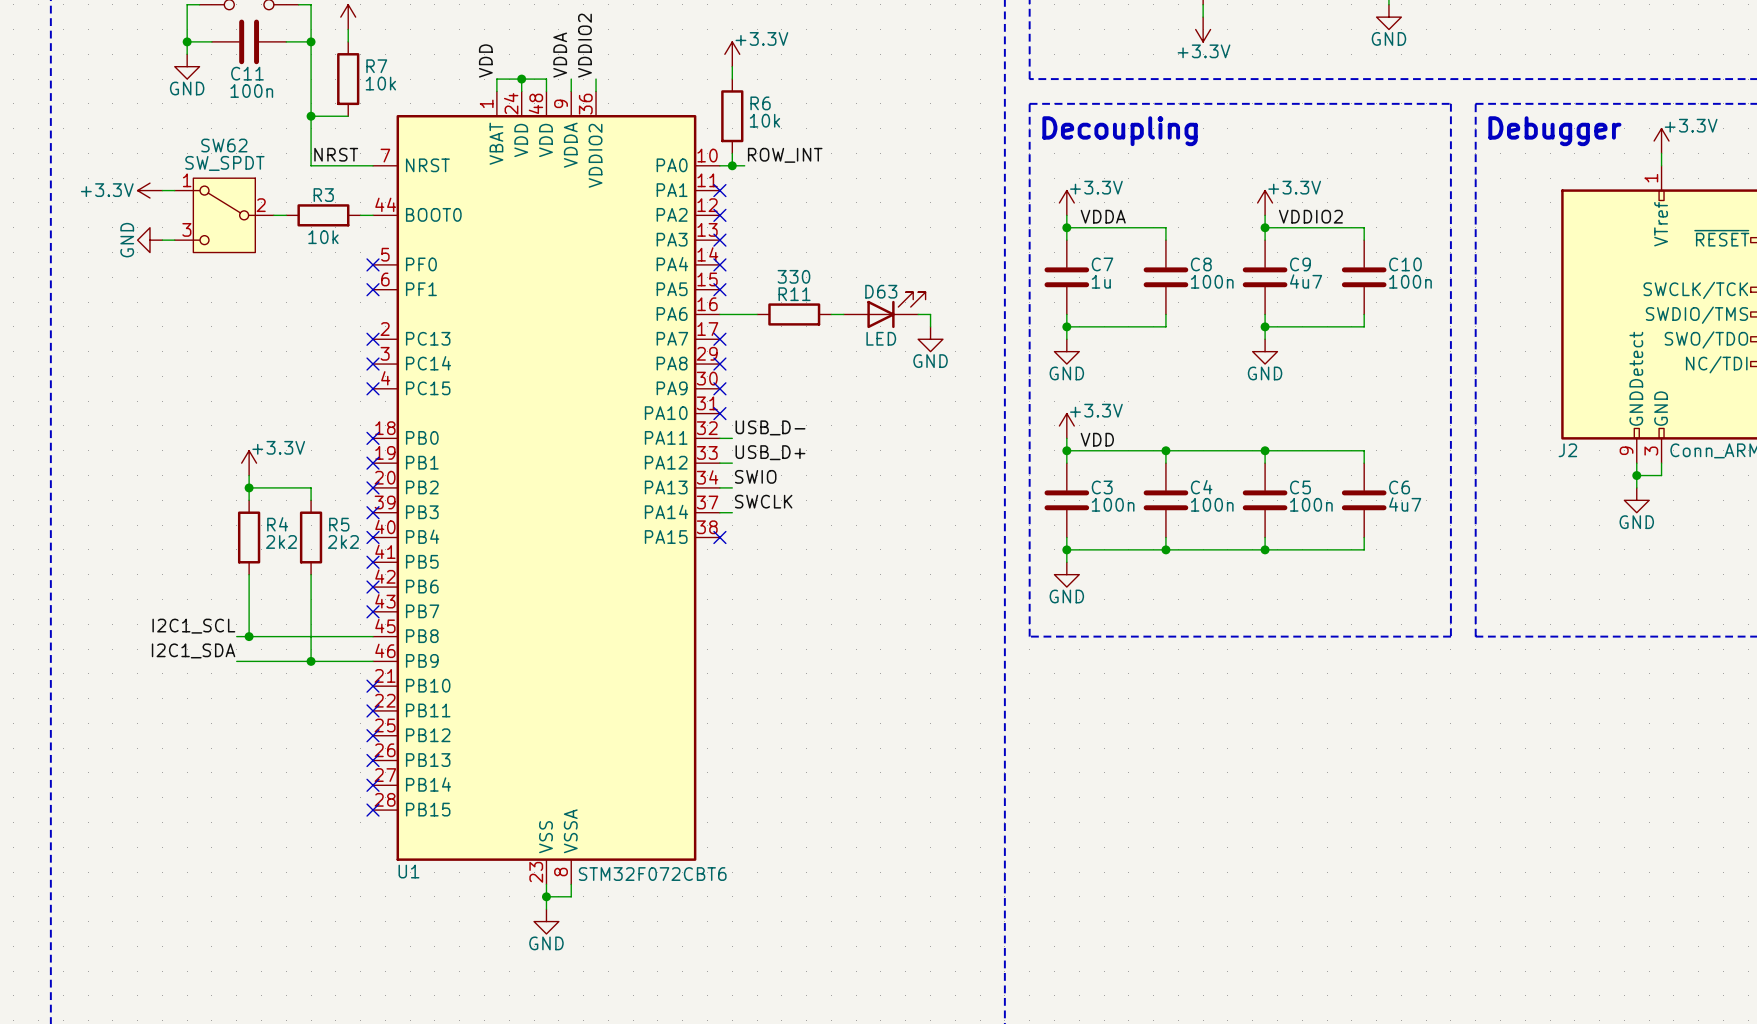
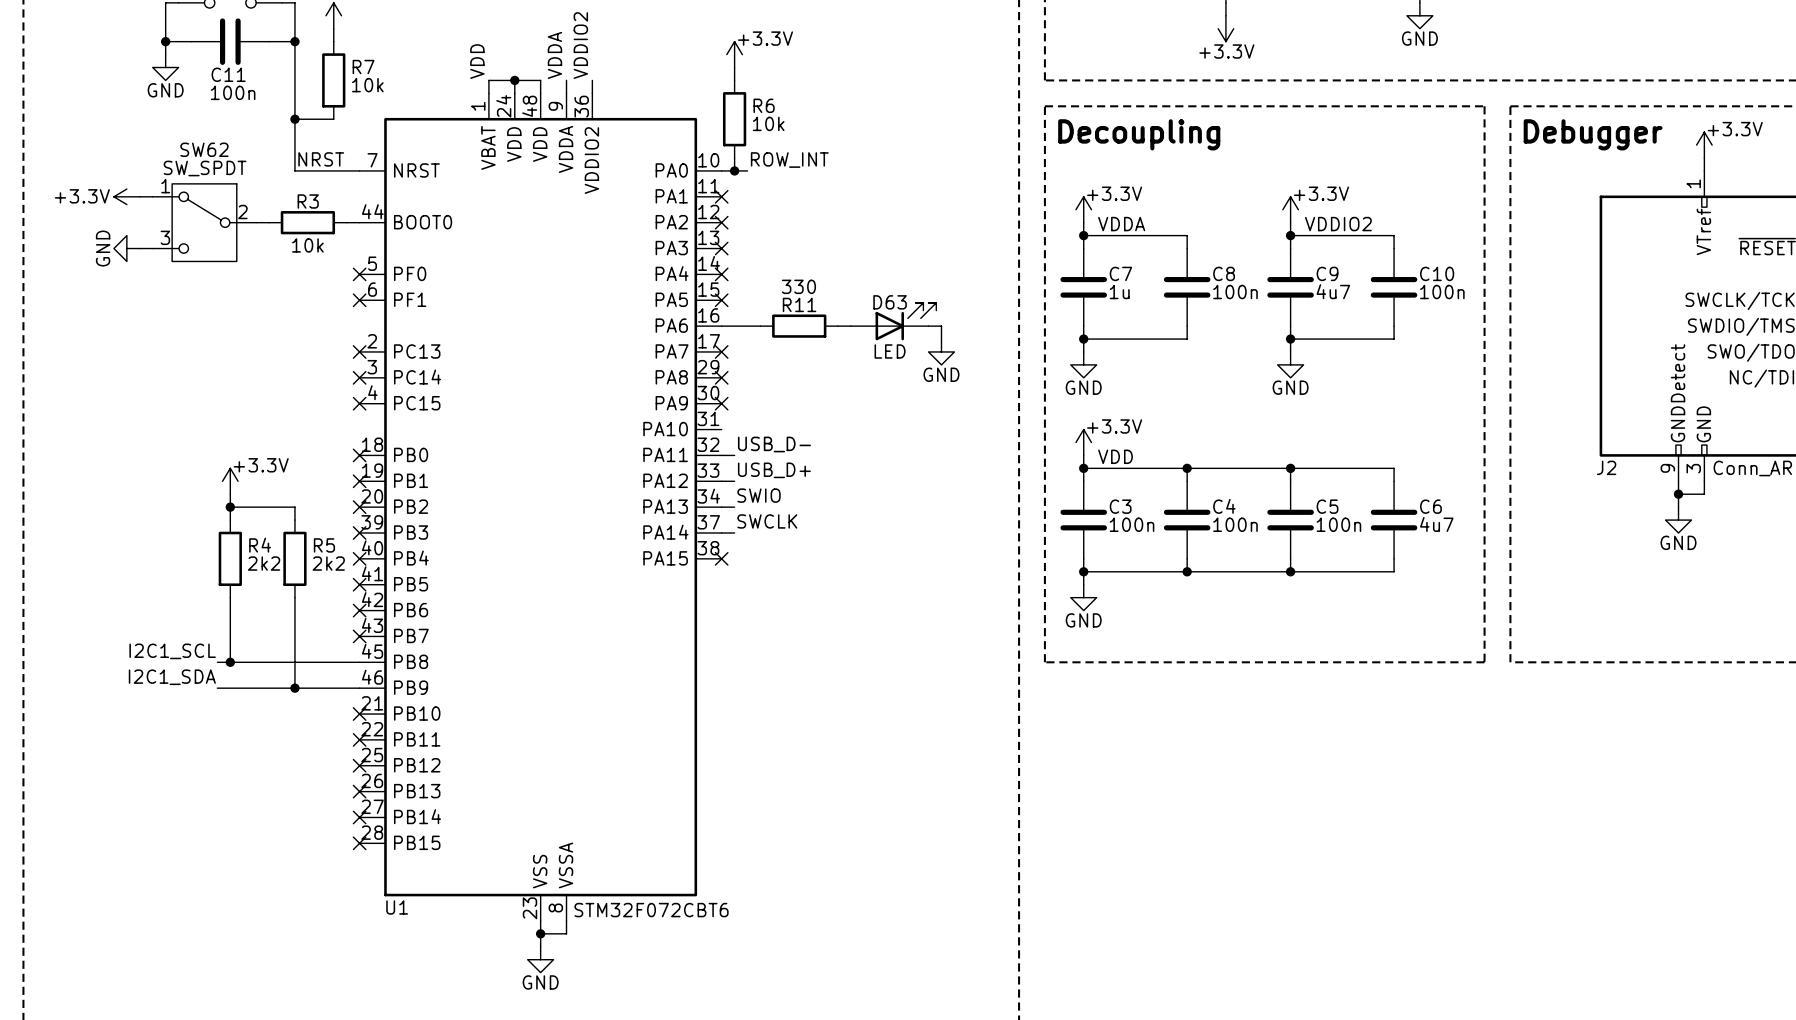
no-connect mark: (719, 413) -> none

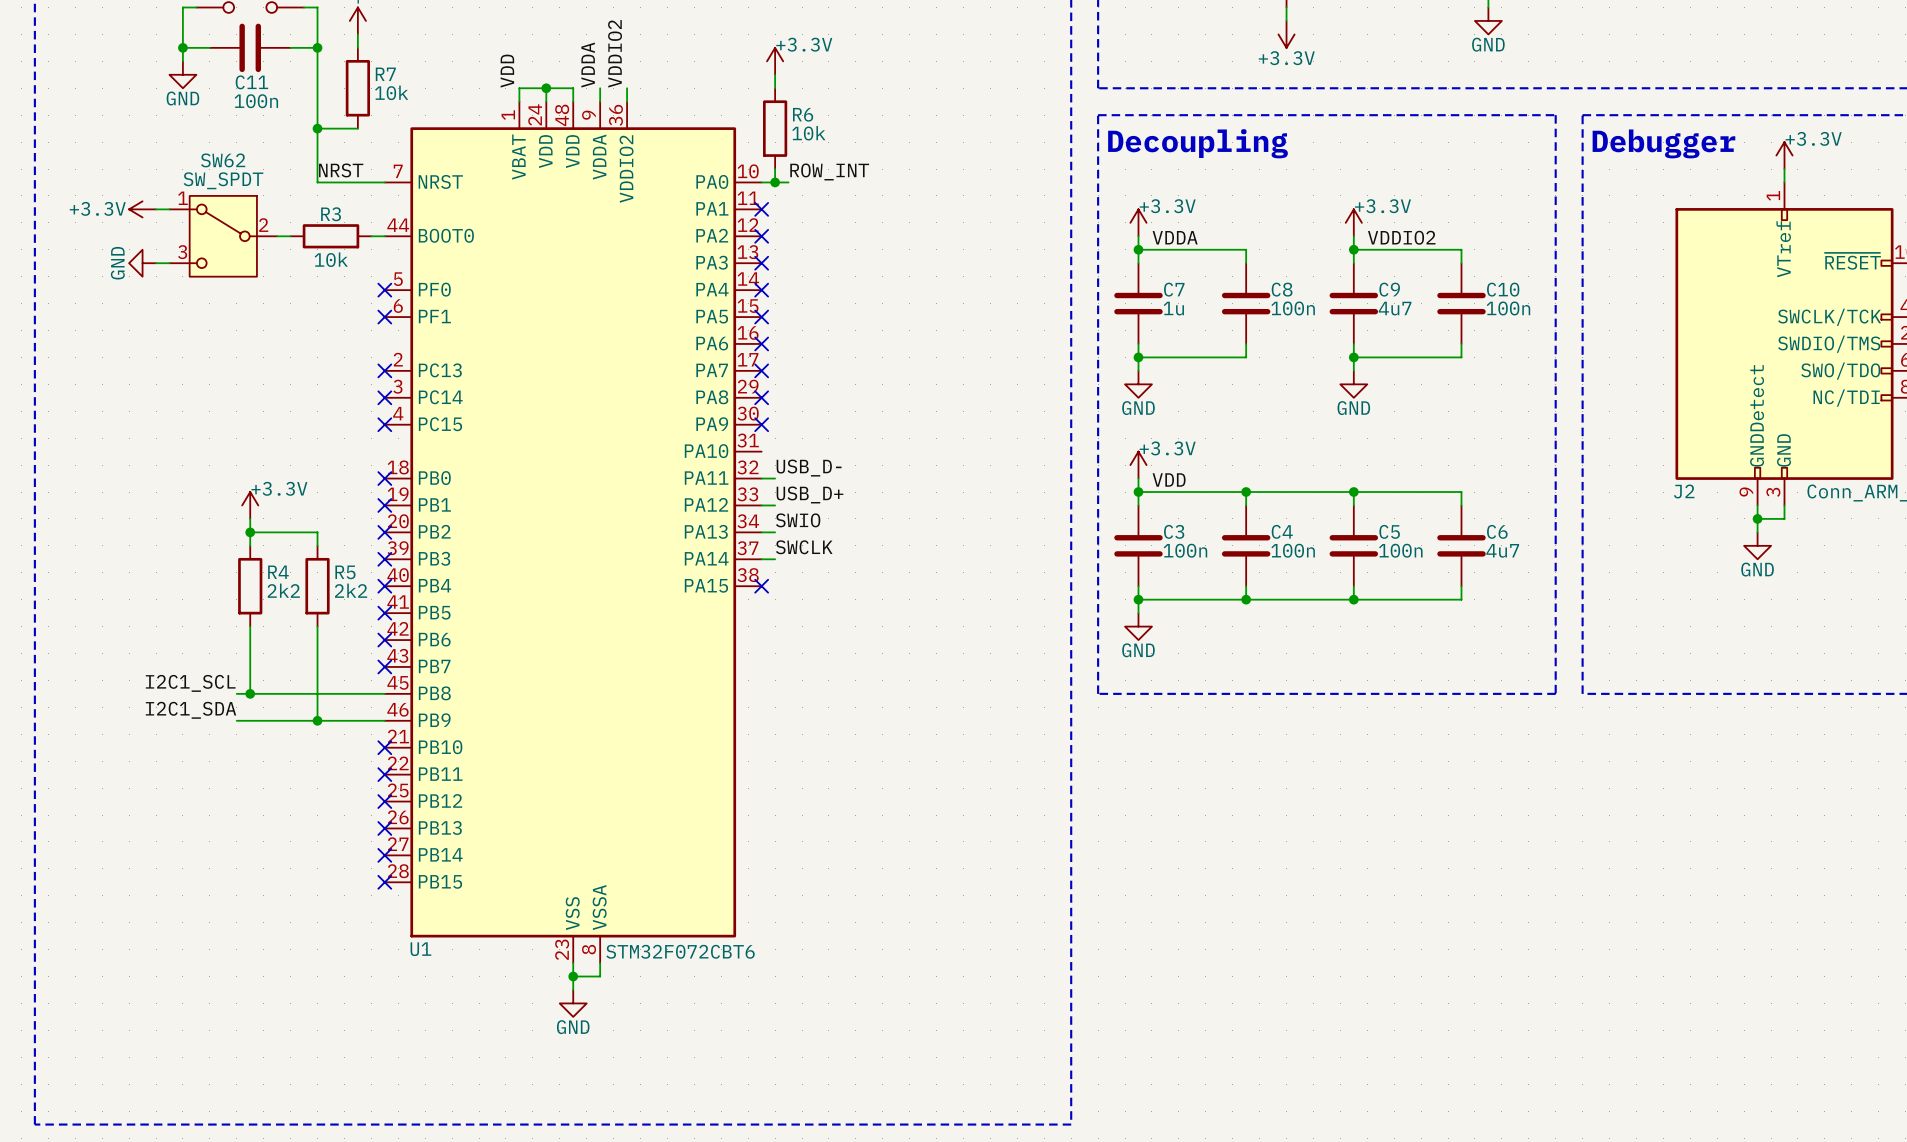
D63: LED (893, 321) -> none
wire: (721, 326) (760, 326) -> none
no-connect mark: none -> (761, 343)
R11: 330 (799, 326) -> none
wire: (838, 326) (850, 326) -> none
wire: (928, 326) (941, 326) (941, 339) -> none
power symbol: GND (941, 351) -> none

